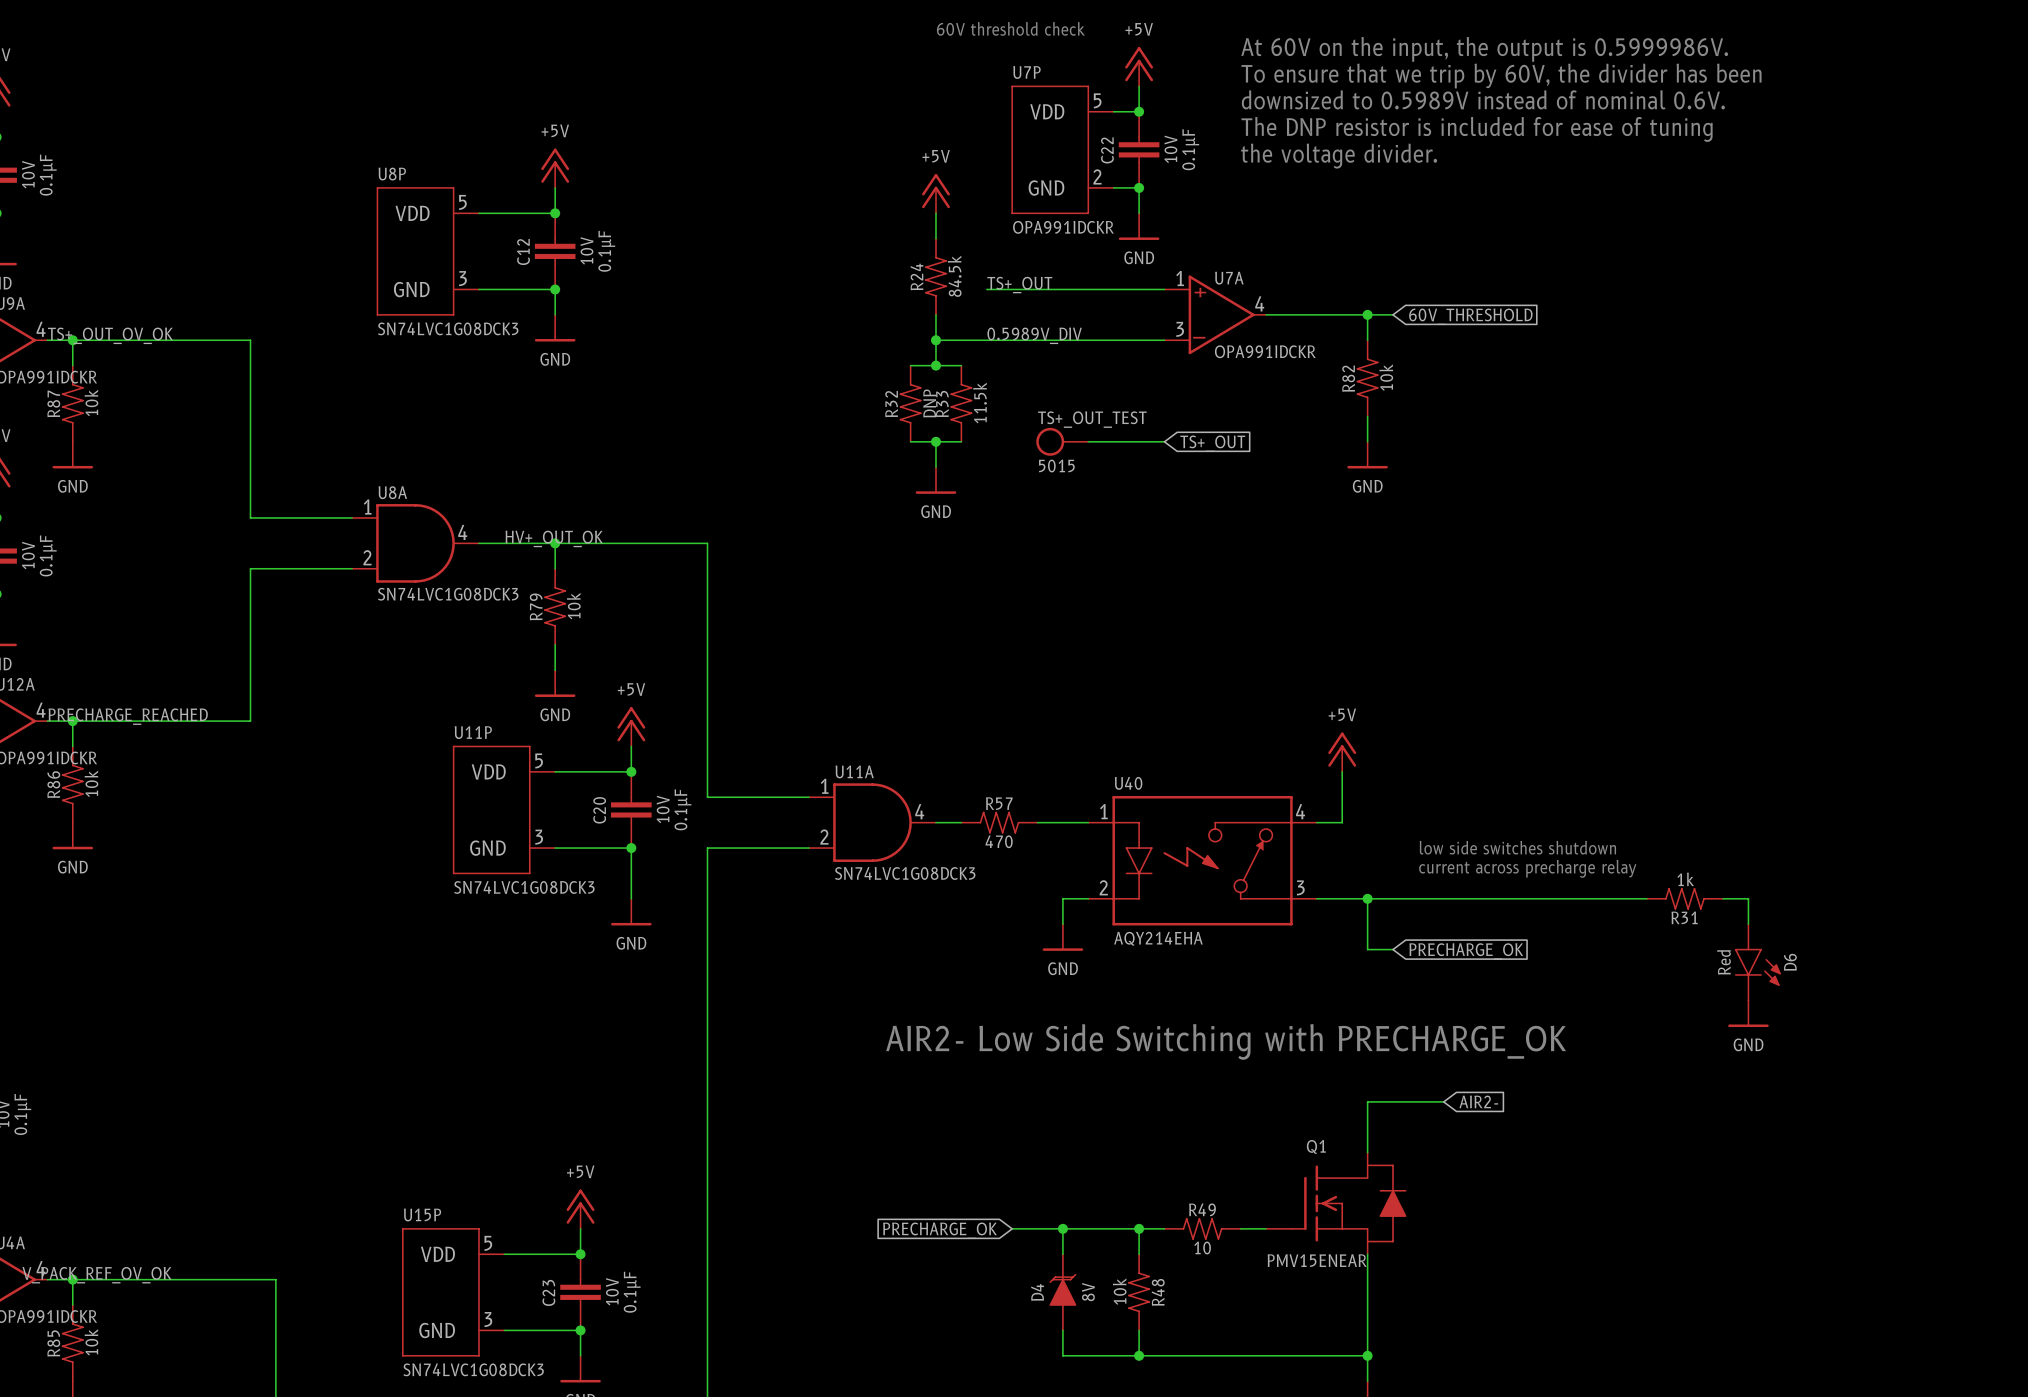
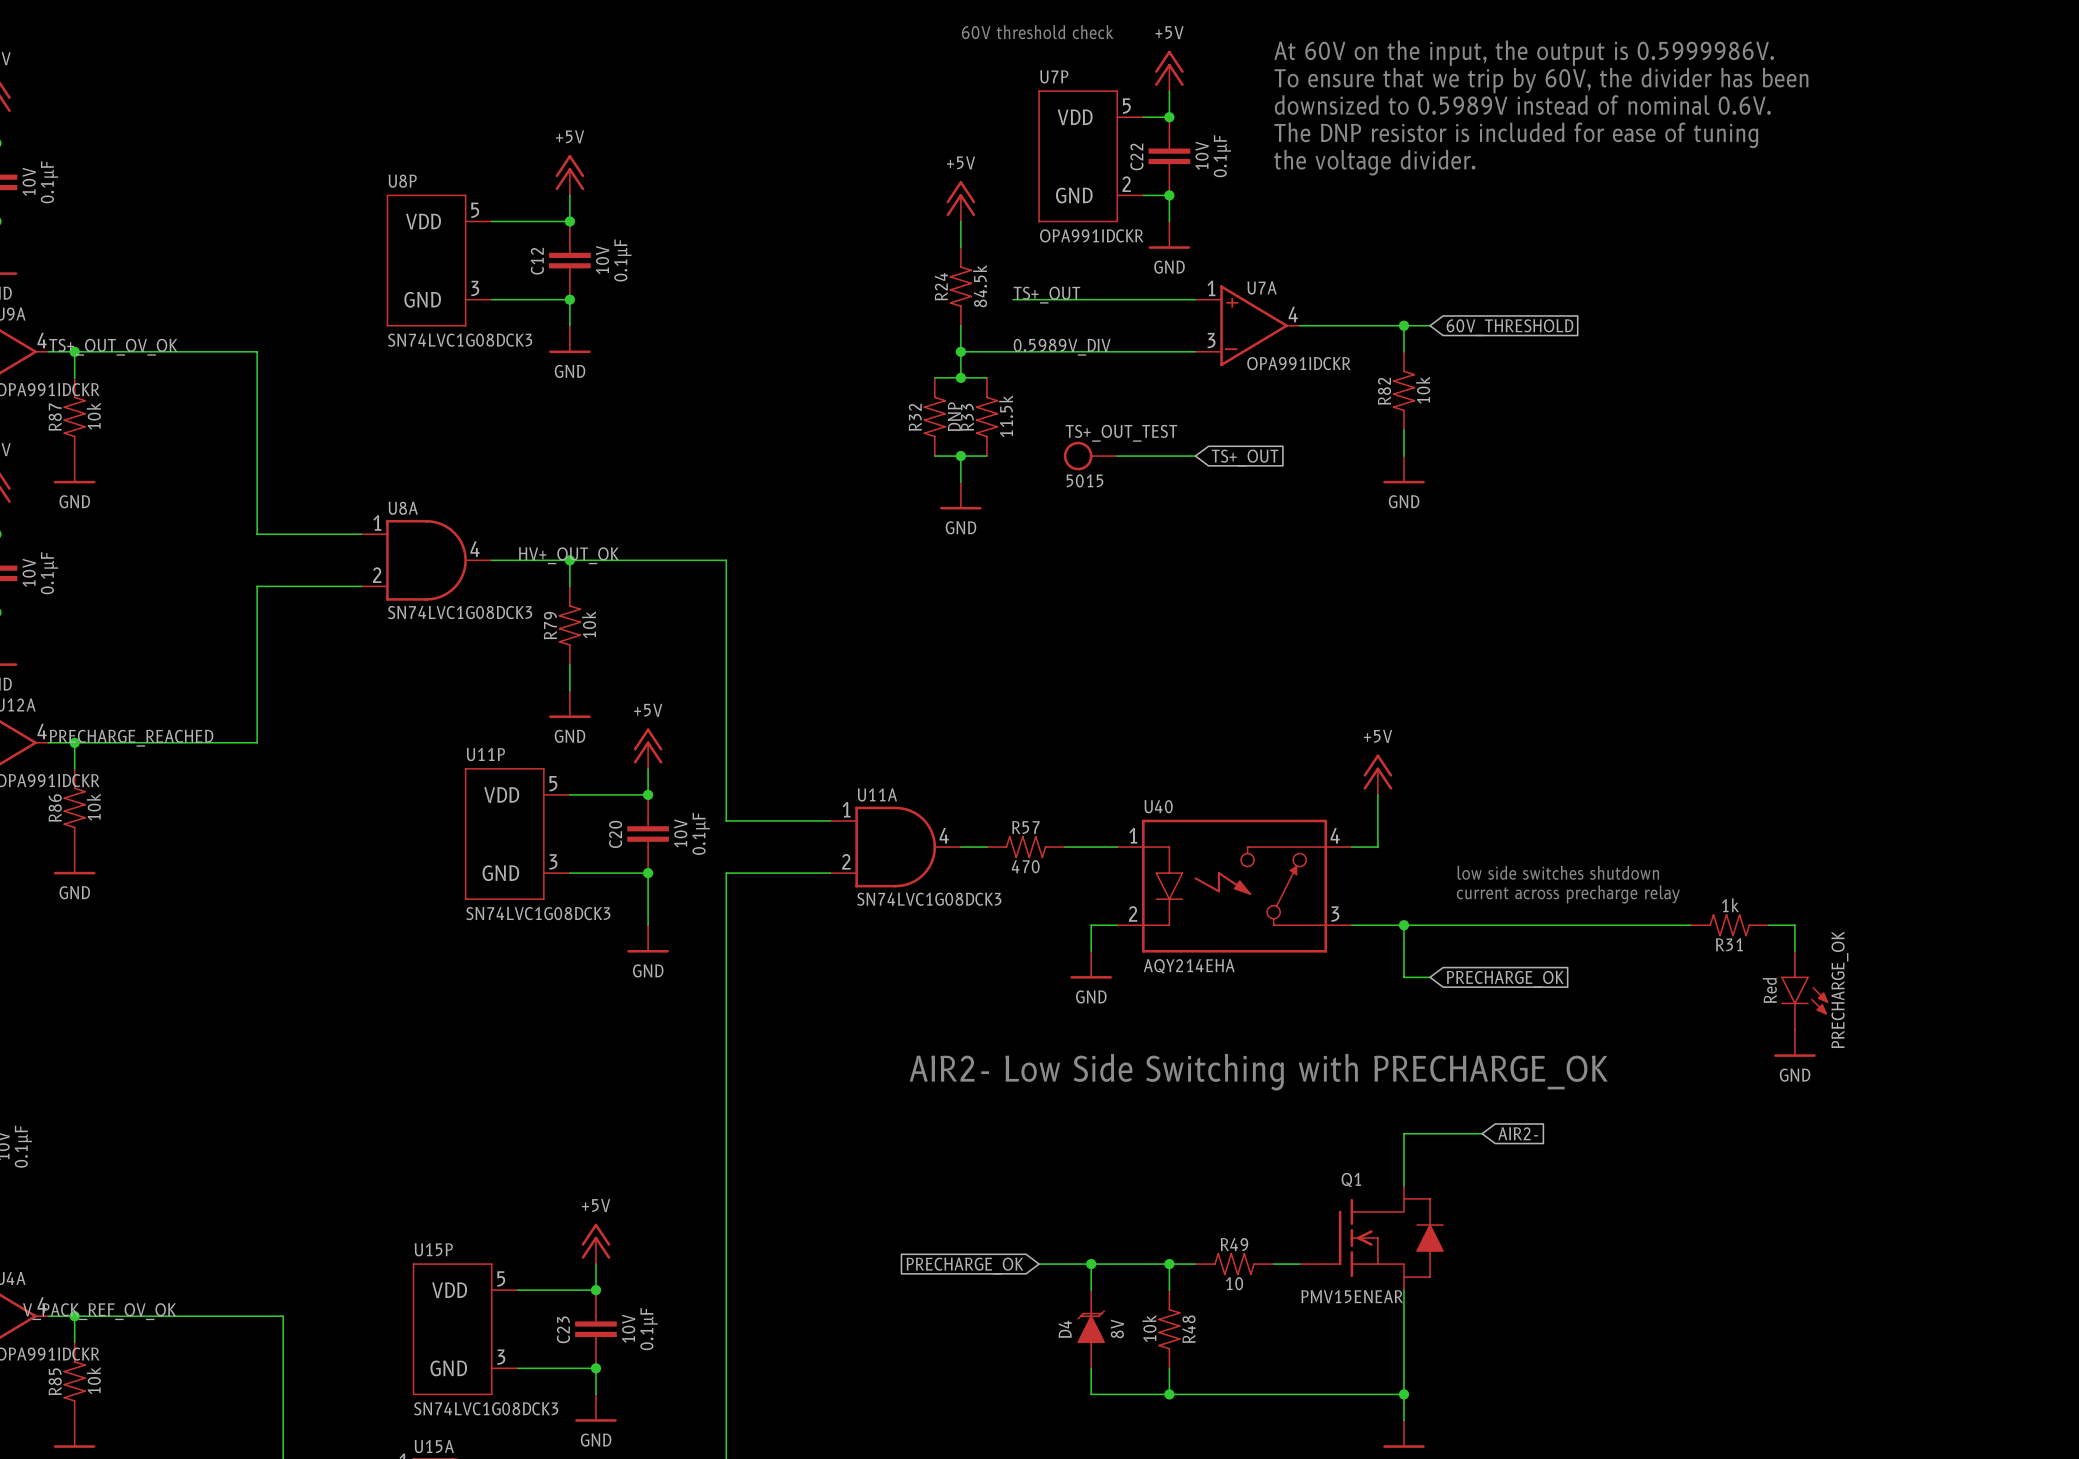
D6 name: D6 (1790, 962) -> PRECHARGE_OK (1839, 989)

